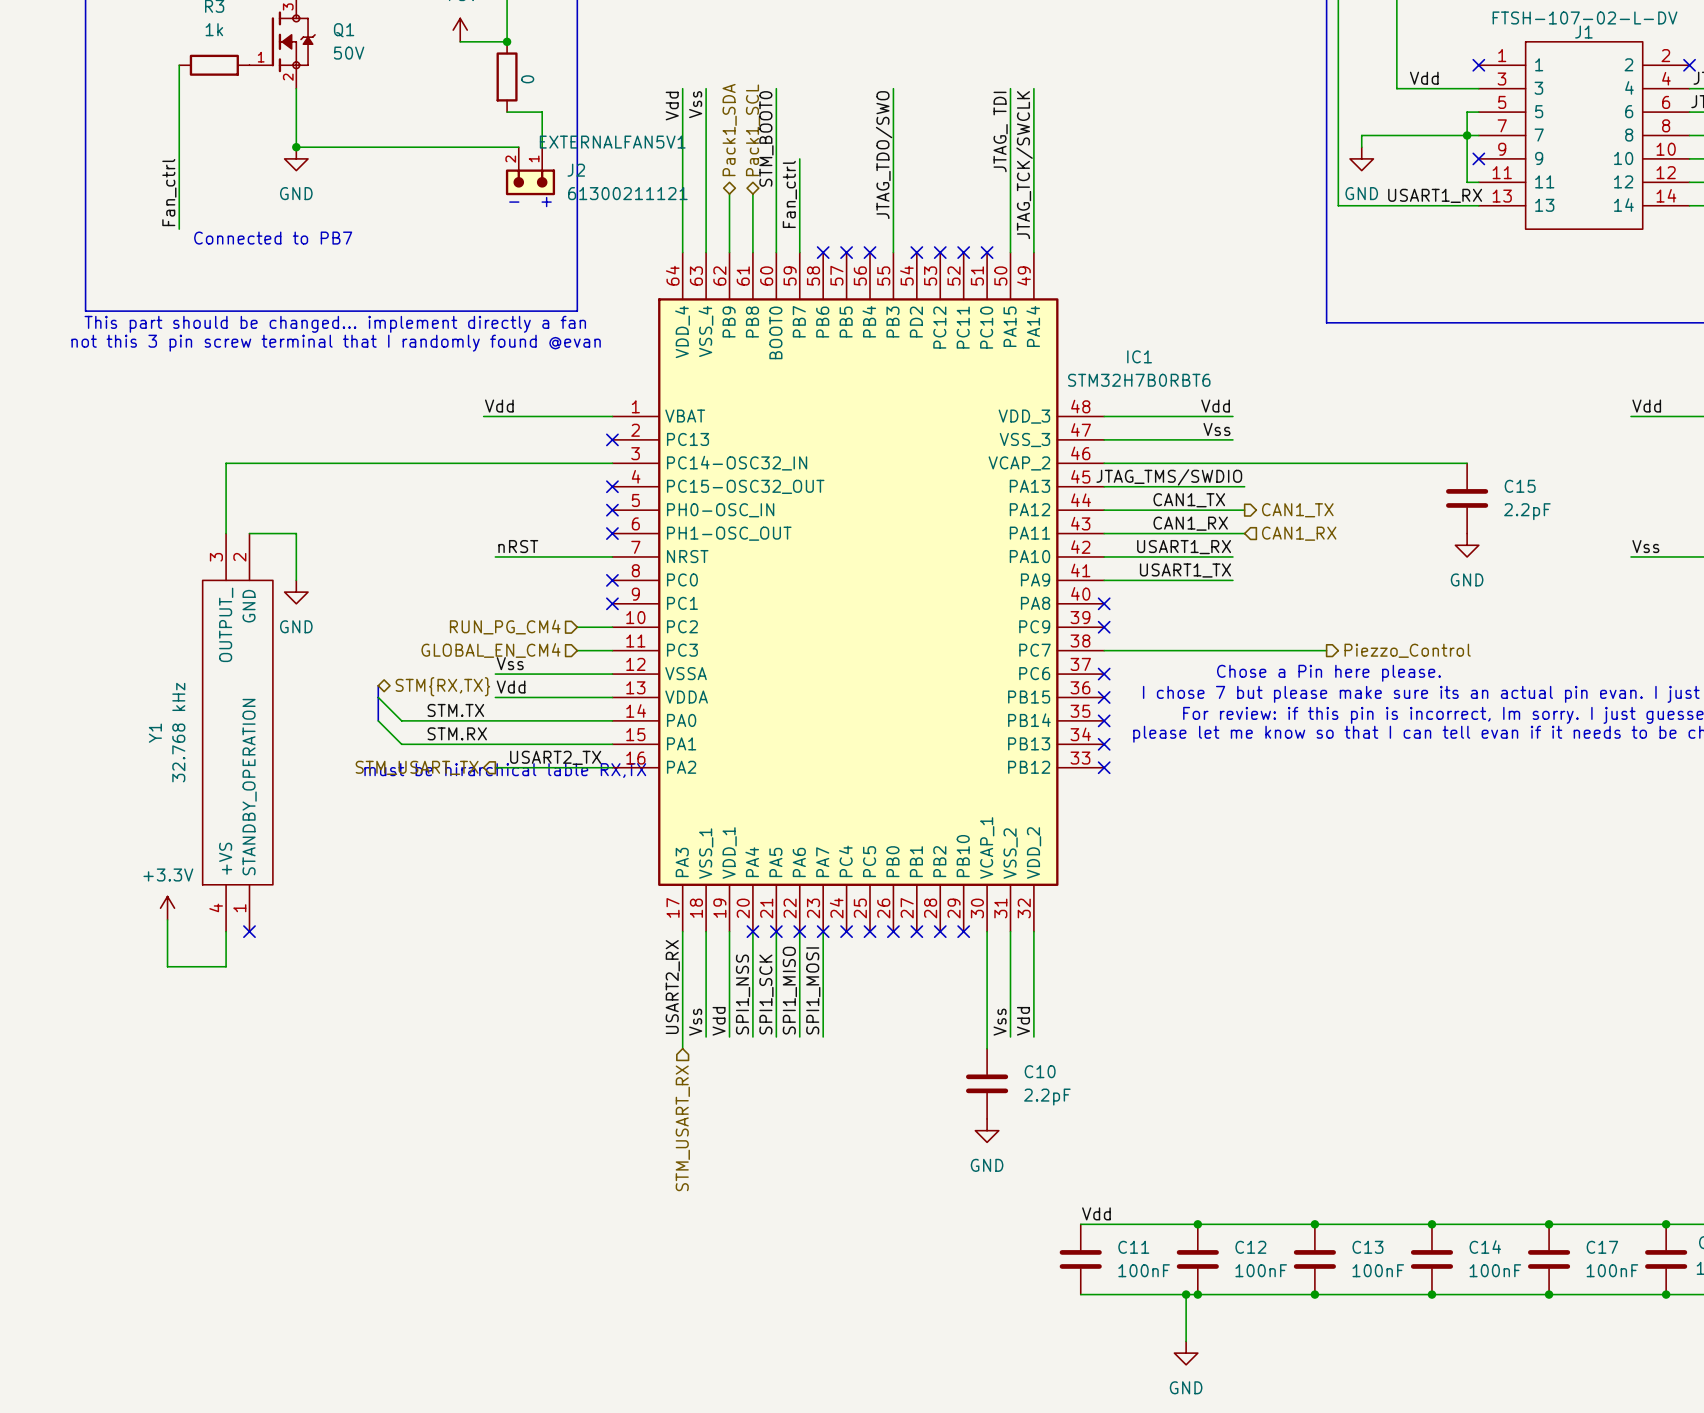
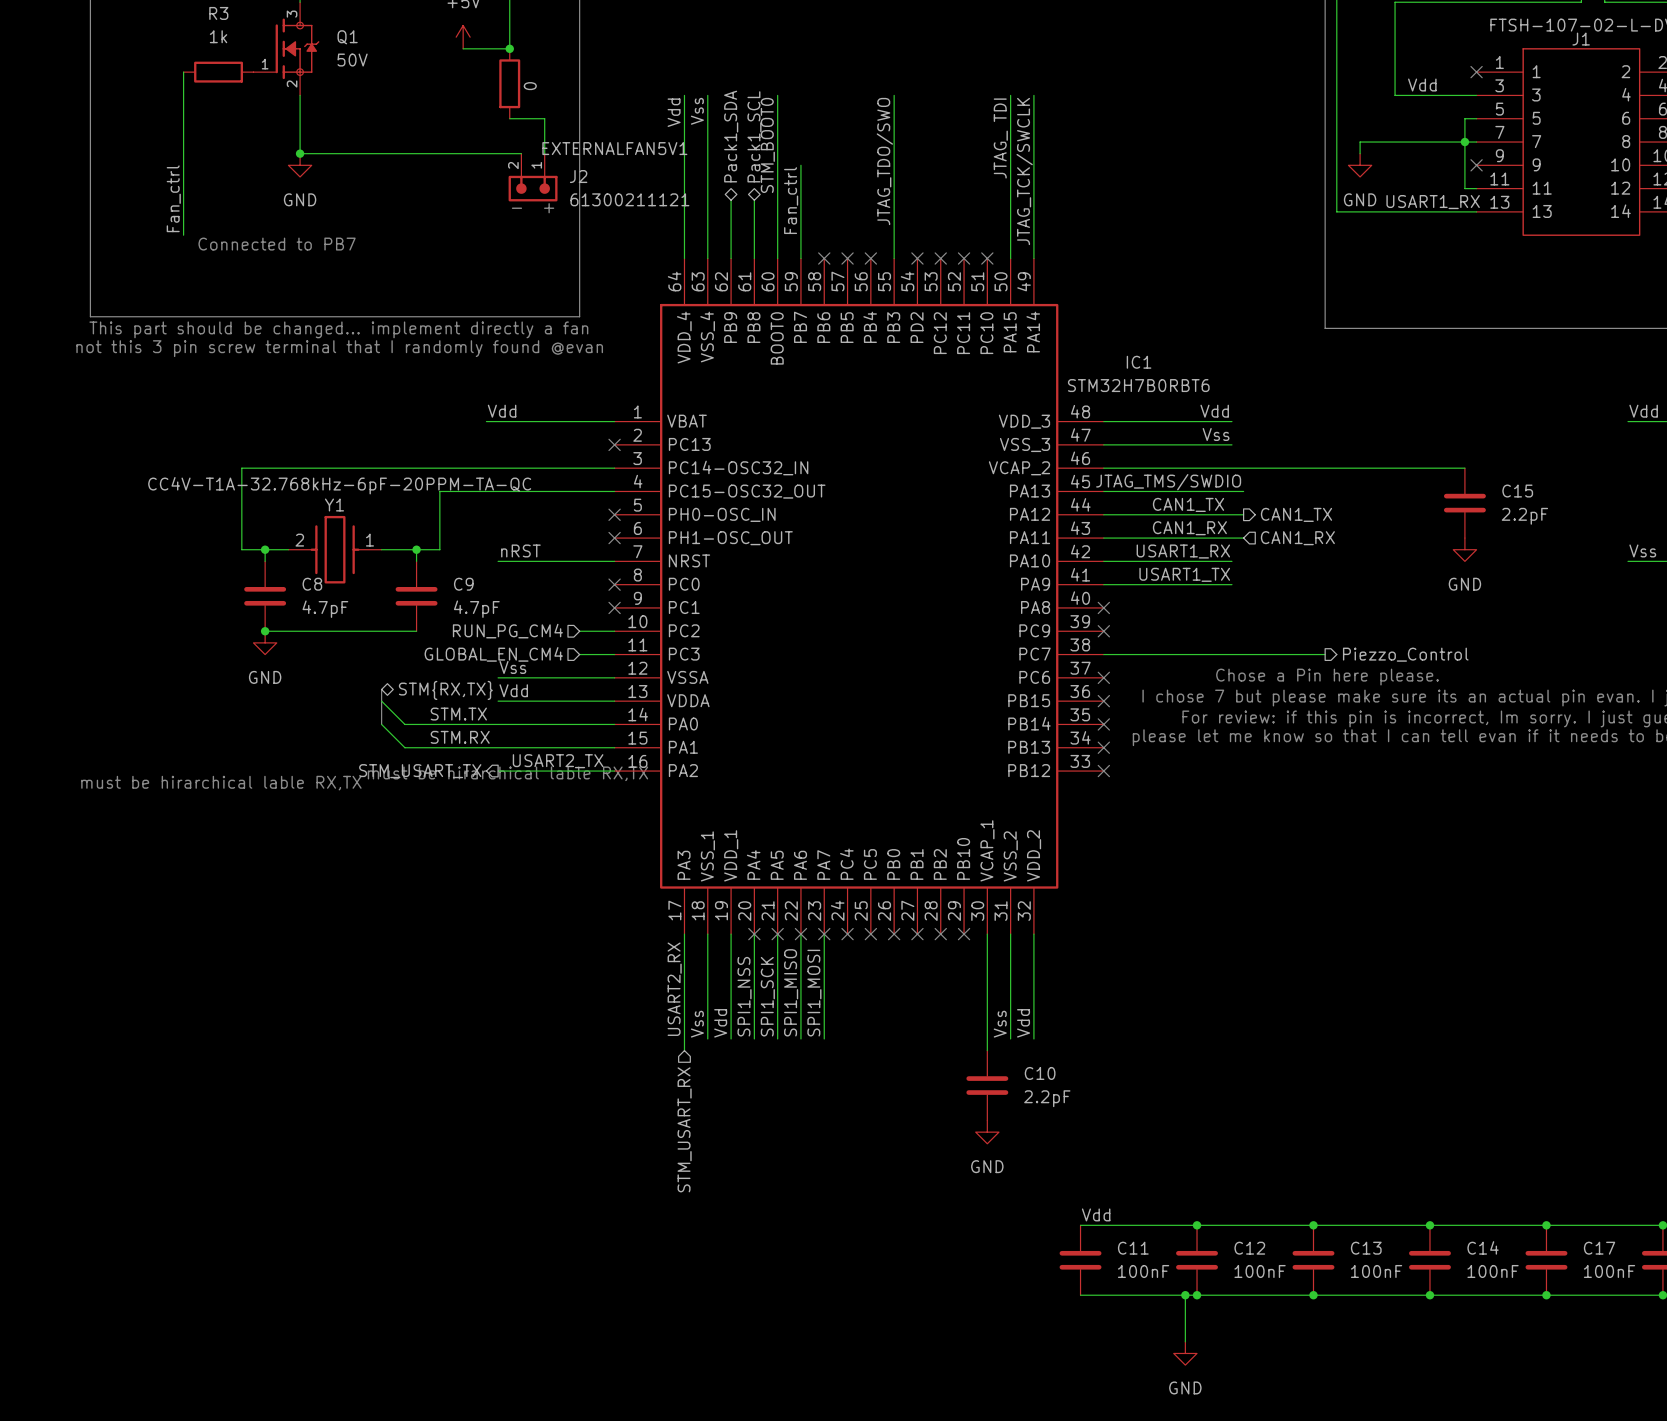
wire: (237, 463) (226, 463) (226, 533) -> (241, 468) (241, 549) (288, 549)
wire: none -> (614, 491) (439, 491) (439, 549) (381, 549)
no-connect mark: (612, 486) -> none
Y1 symbol: [201, 533, 274, 932] -> [288, 515, 382, 584]
wire: (249, 533) (296, 533) (296, 580) -> none
wire: none -> (265, 549) (265, 561)
junction: none -> (265, 549)
wire: none -> (416, 549) (416, 561)
junction: none -> (416, 549)
C8: none -> 4.7pF (265, 596)
power symbol position: GND (296, 592) -> GND (265, 642)
C9: none -> 4.7pF (416, 596)
wire: none -> (265, 631) (416, 631)
junction: none -> (265, 631)
Y1 value: 32.768 kHz (178, 732) -> CC4V-T1A-32.768kHz-6pF-20PPM-TA-QC (339, 485)
Y1 name position: Y1 (155, 733) -> Y1 (334, 505)
text: none -> must be hirarchical lable RX,TX (221, 783)
power symbol: +3.3V (167, 908) -> none
wire: (167, 919) (167, 966) (226, 966) (226, 931) -> none
no-connect mark: (249, 931) -> none

